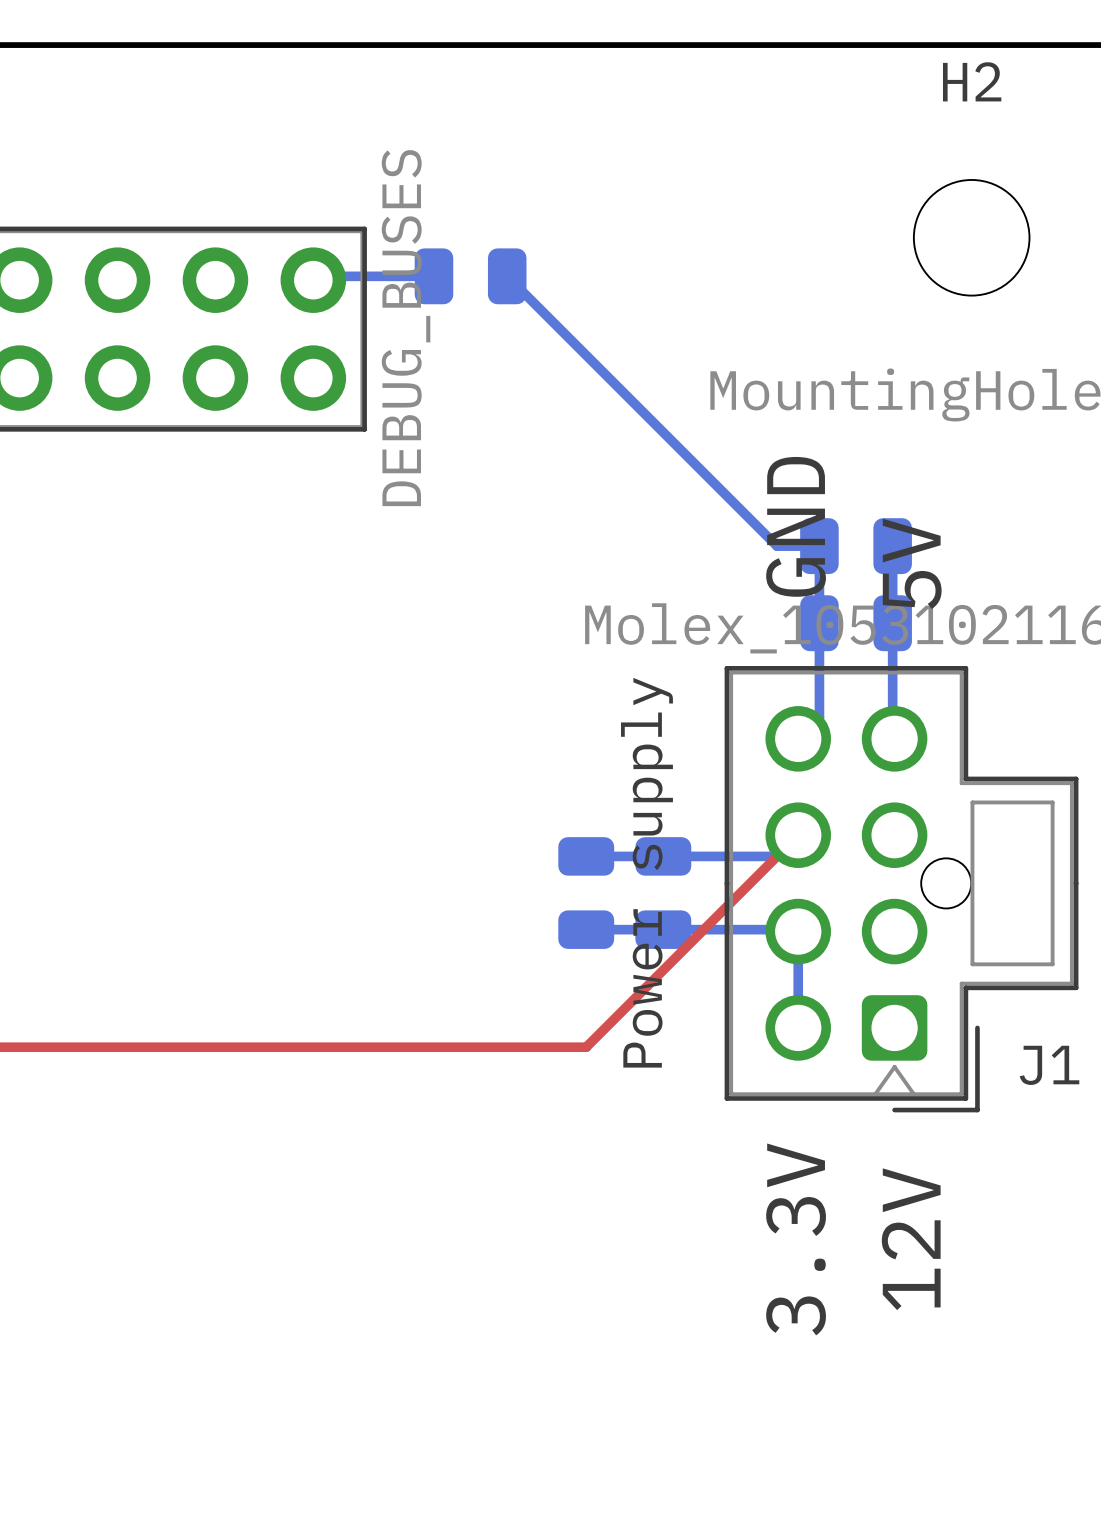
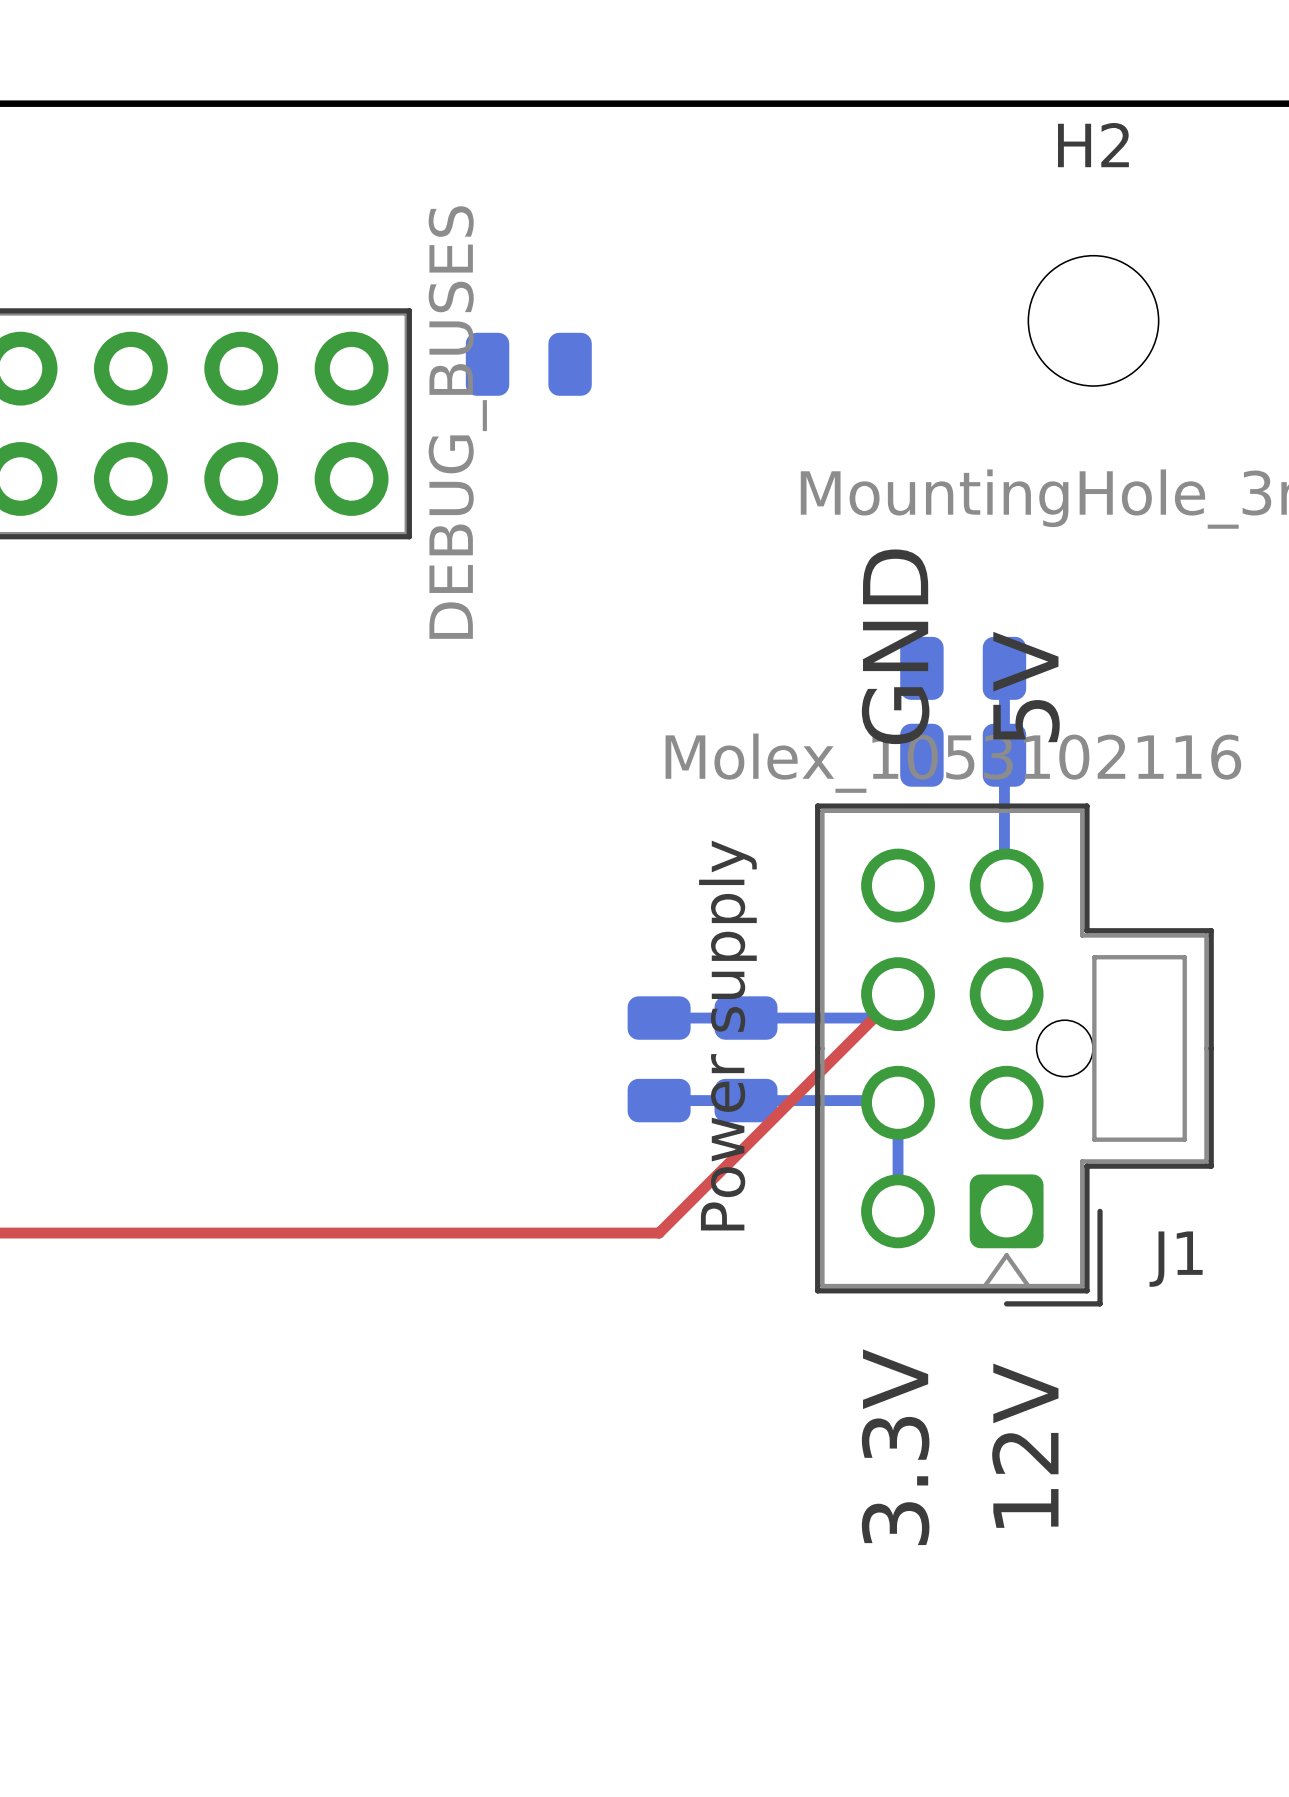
bottom track: (433, 276) (317, 276) (313, 280) -> none
bottom track: (507, 276) (777, 546) (819, 546) (819, 717) (798, 738) -> none

